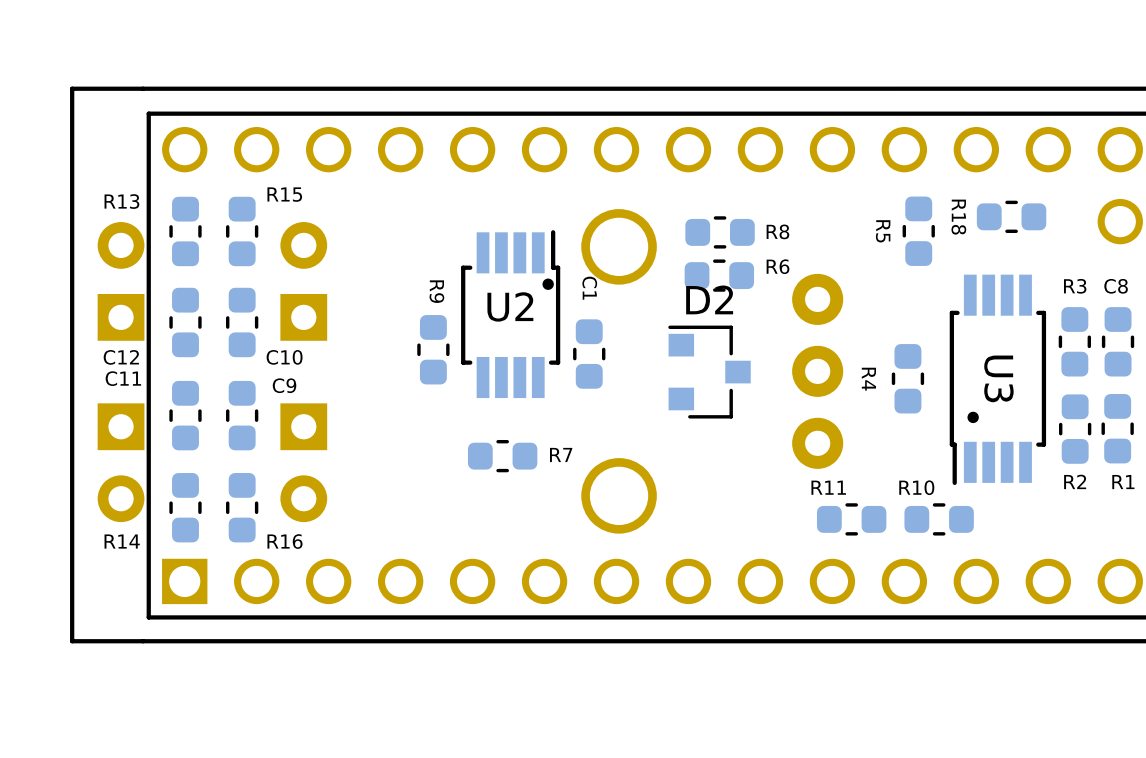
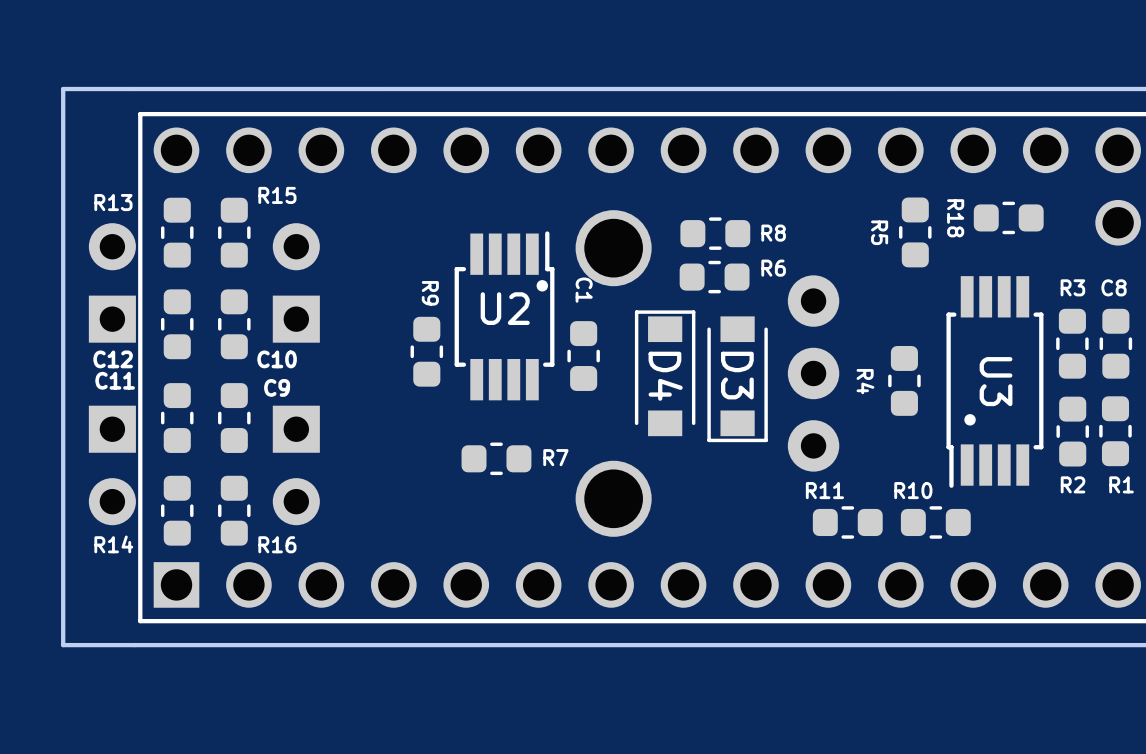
D4: none -> (665, 373)
D2: (709, 372) -> none
D3: none -> (737, 379)

